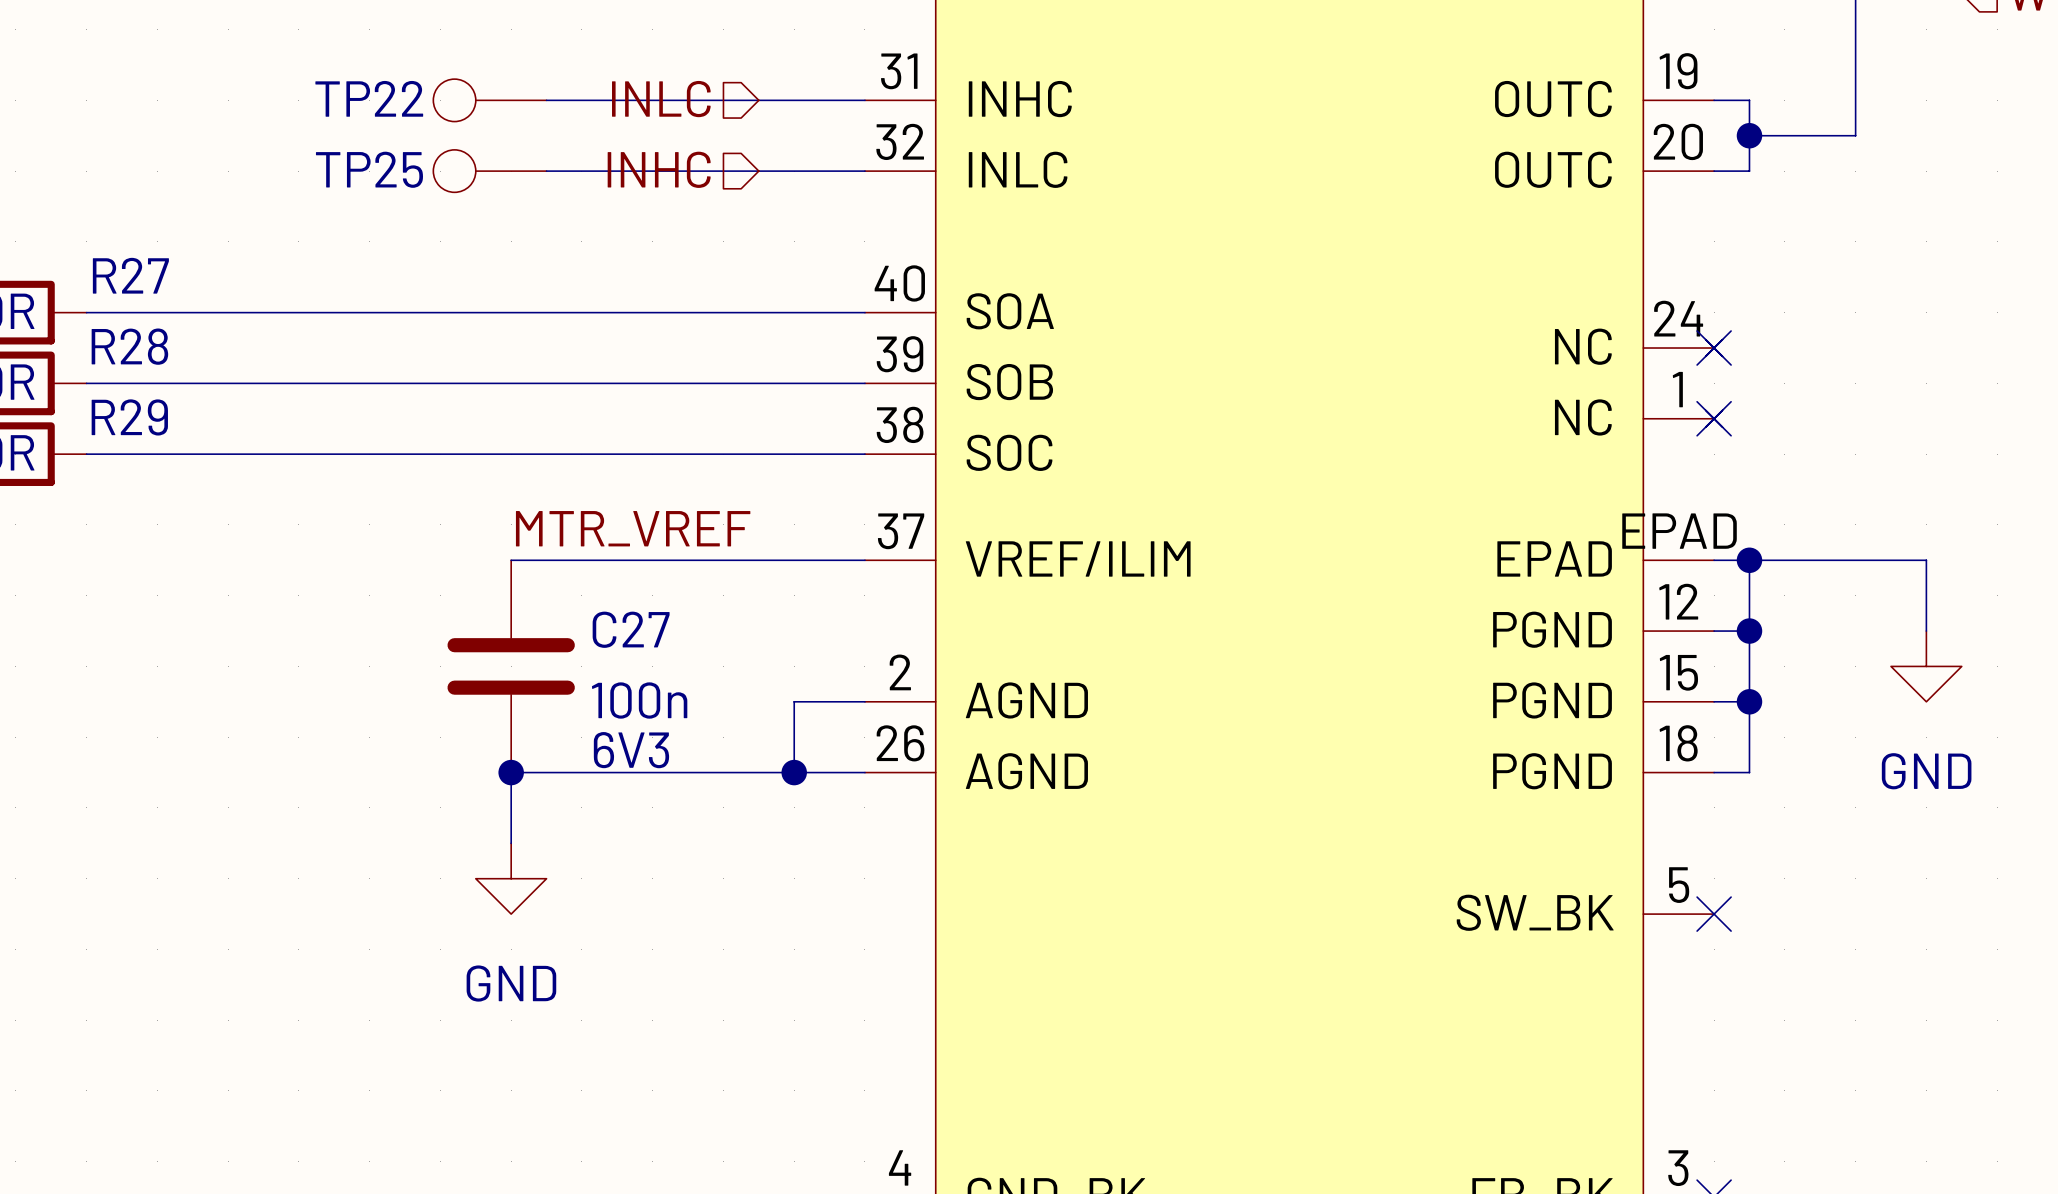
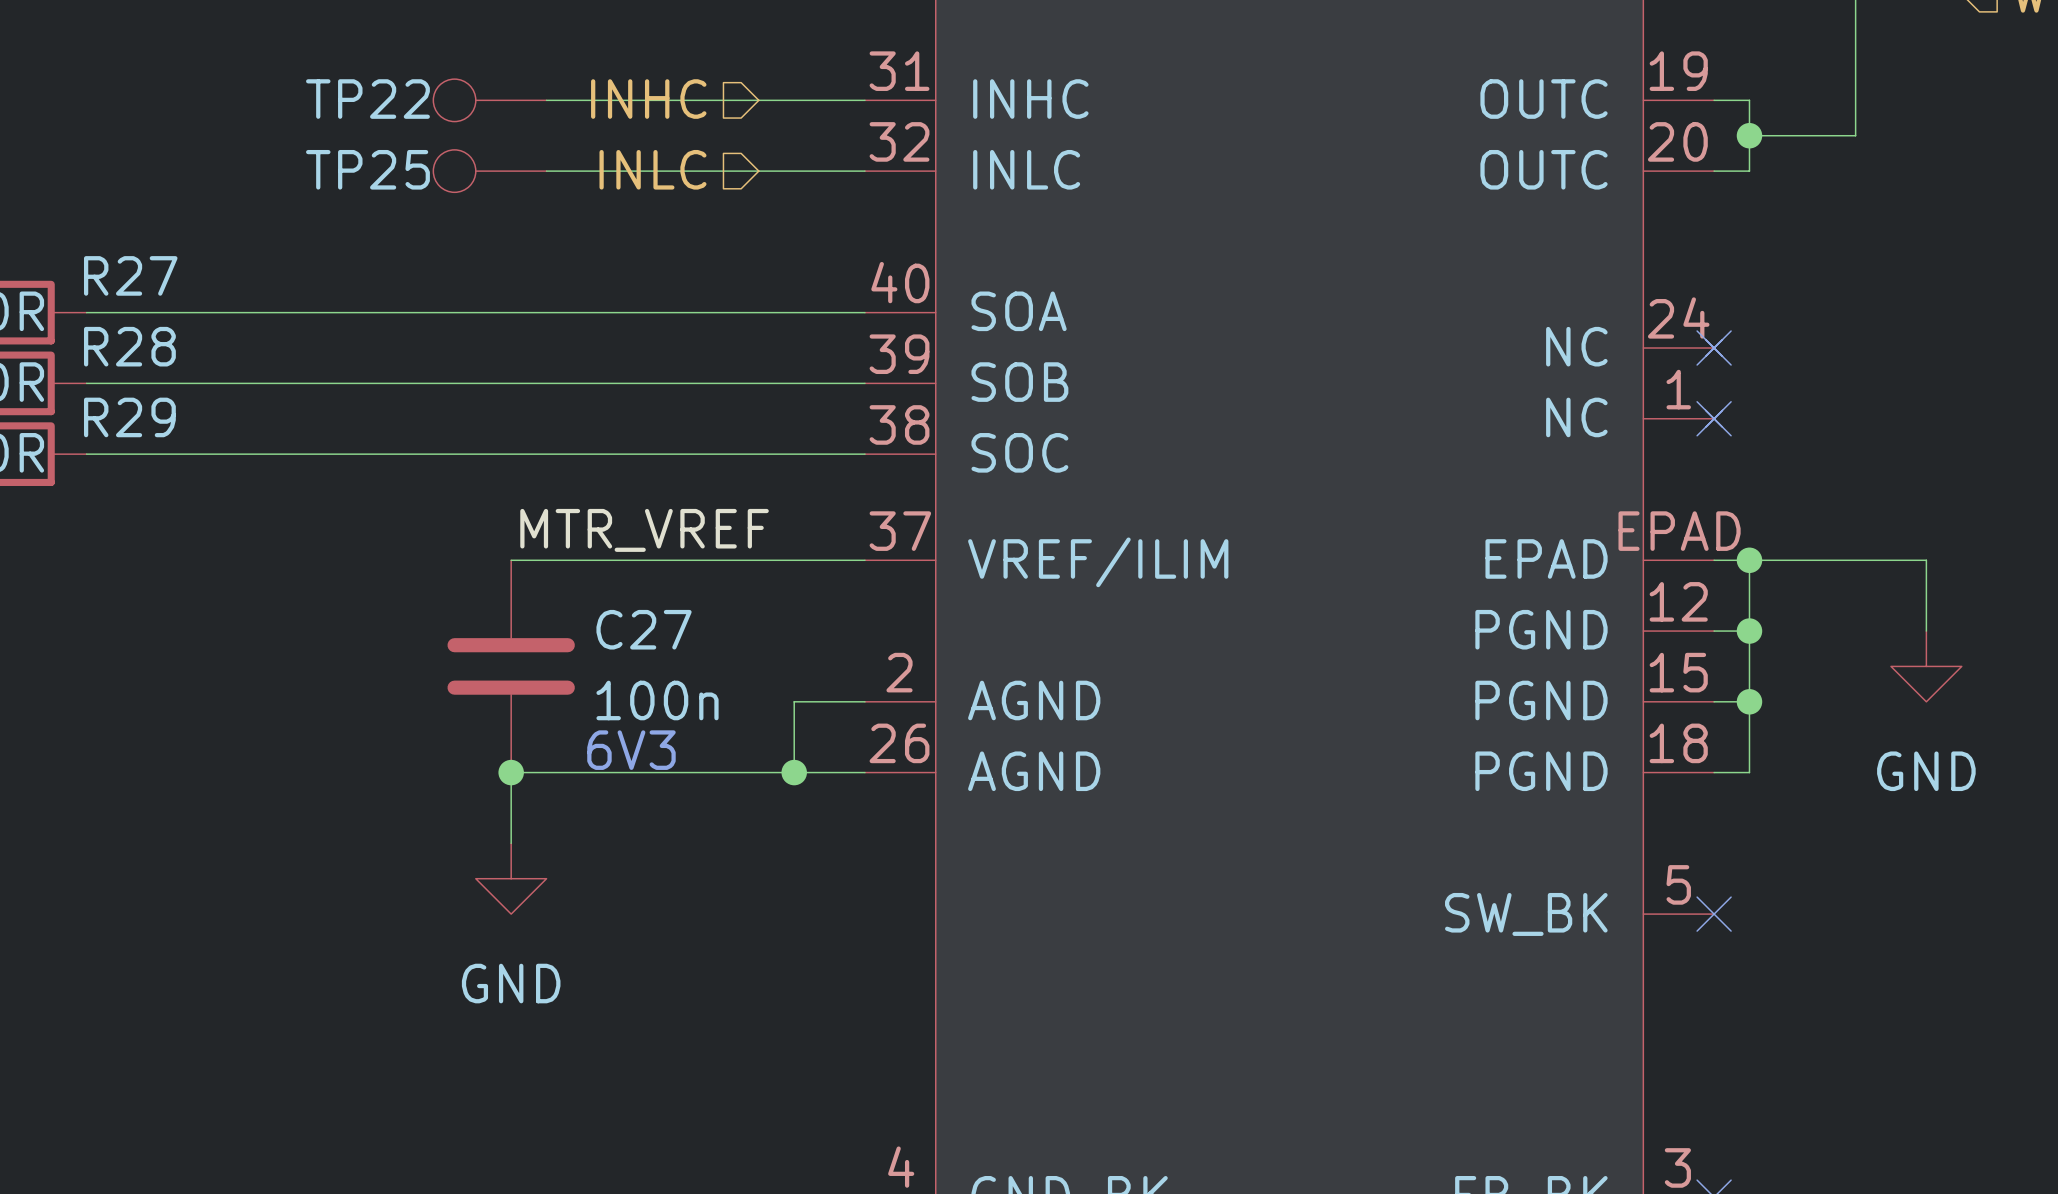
hierarchical label: INLC (661, 99) -> INHC (648, 99)
hierarchical label: INHC (659, 169) -> INLC (652, 169)

